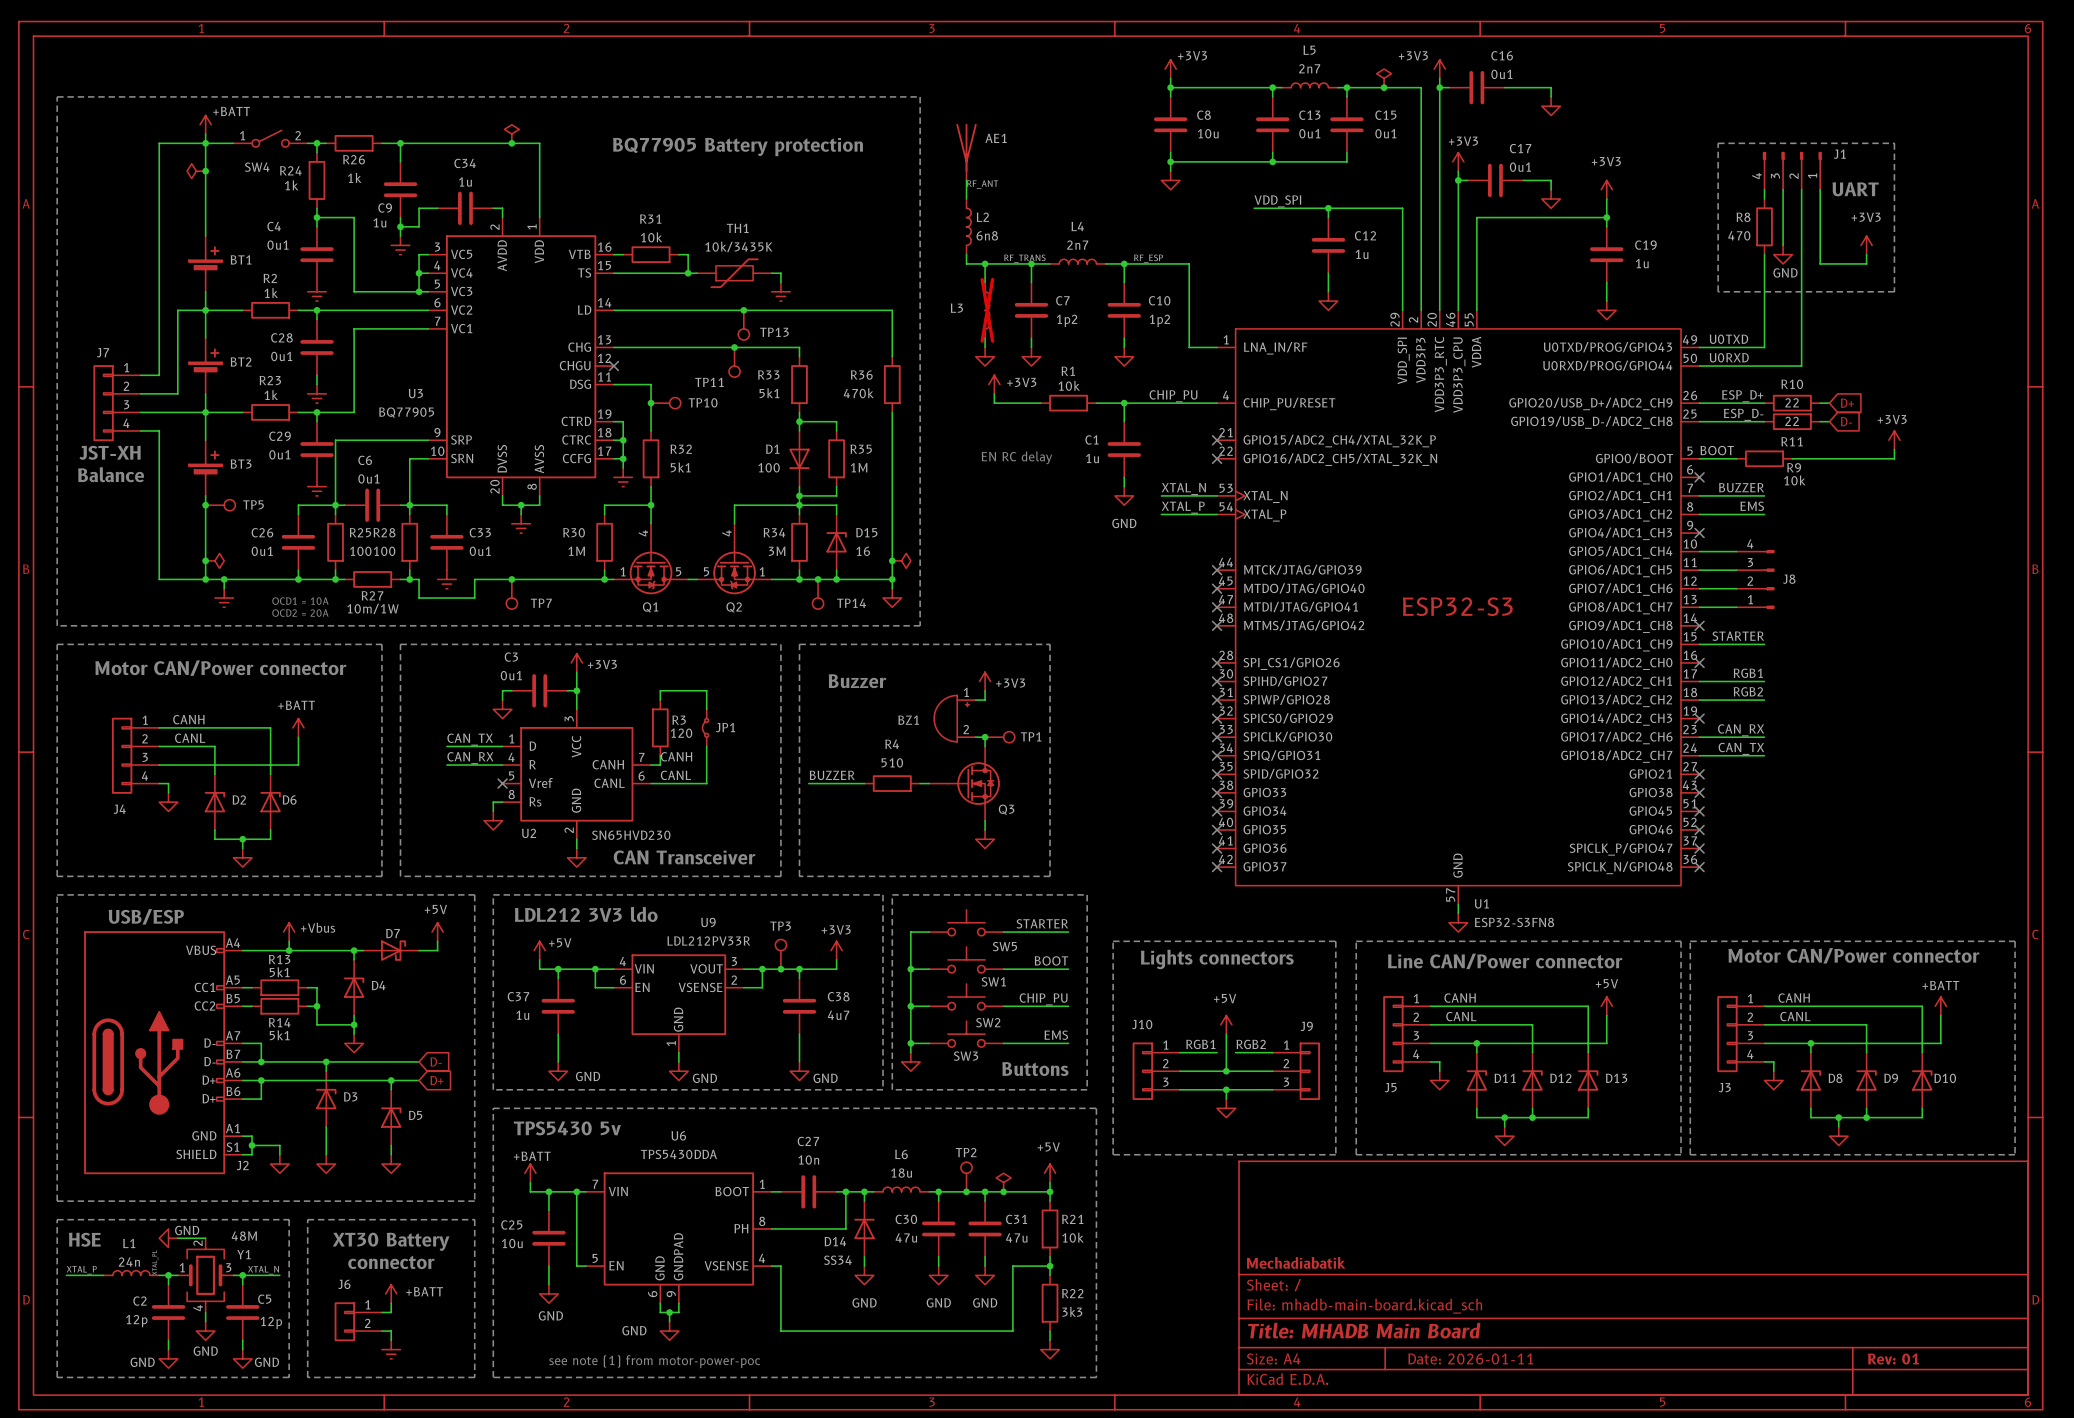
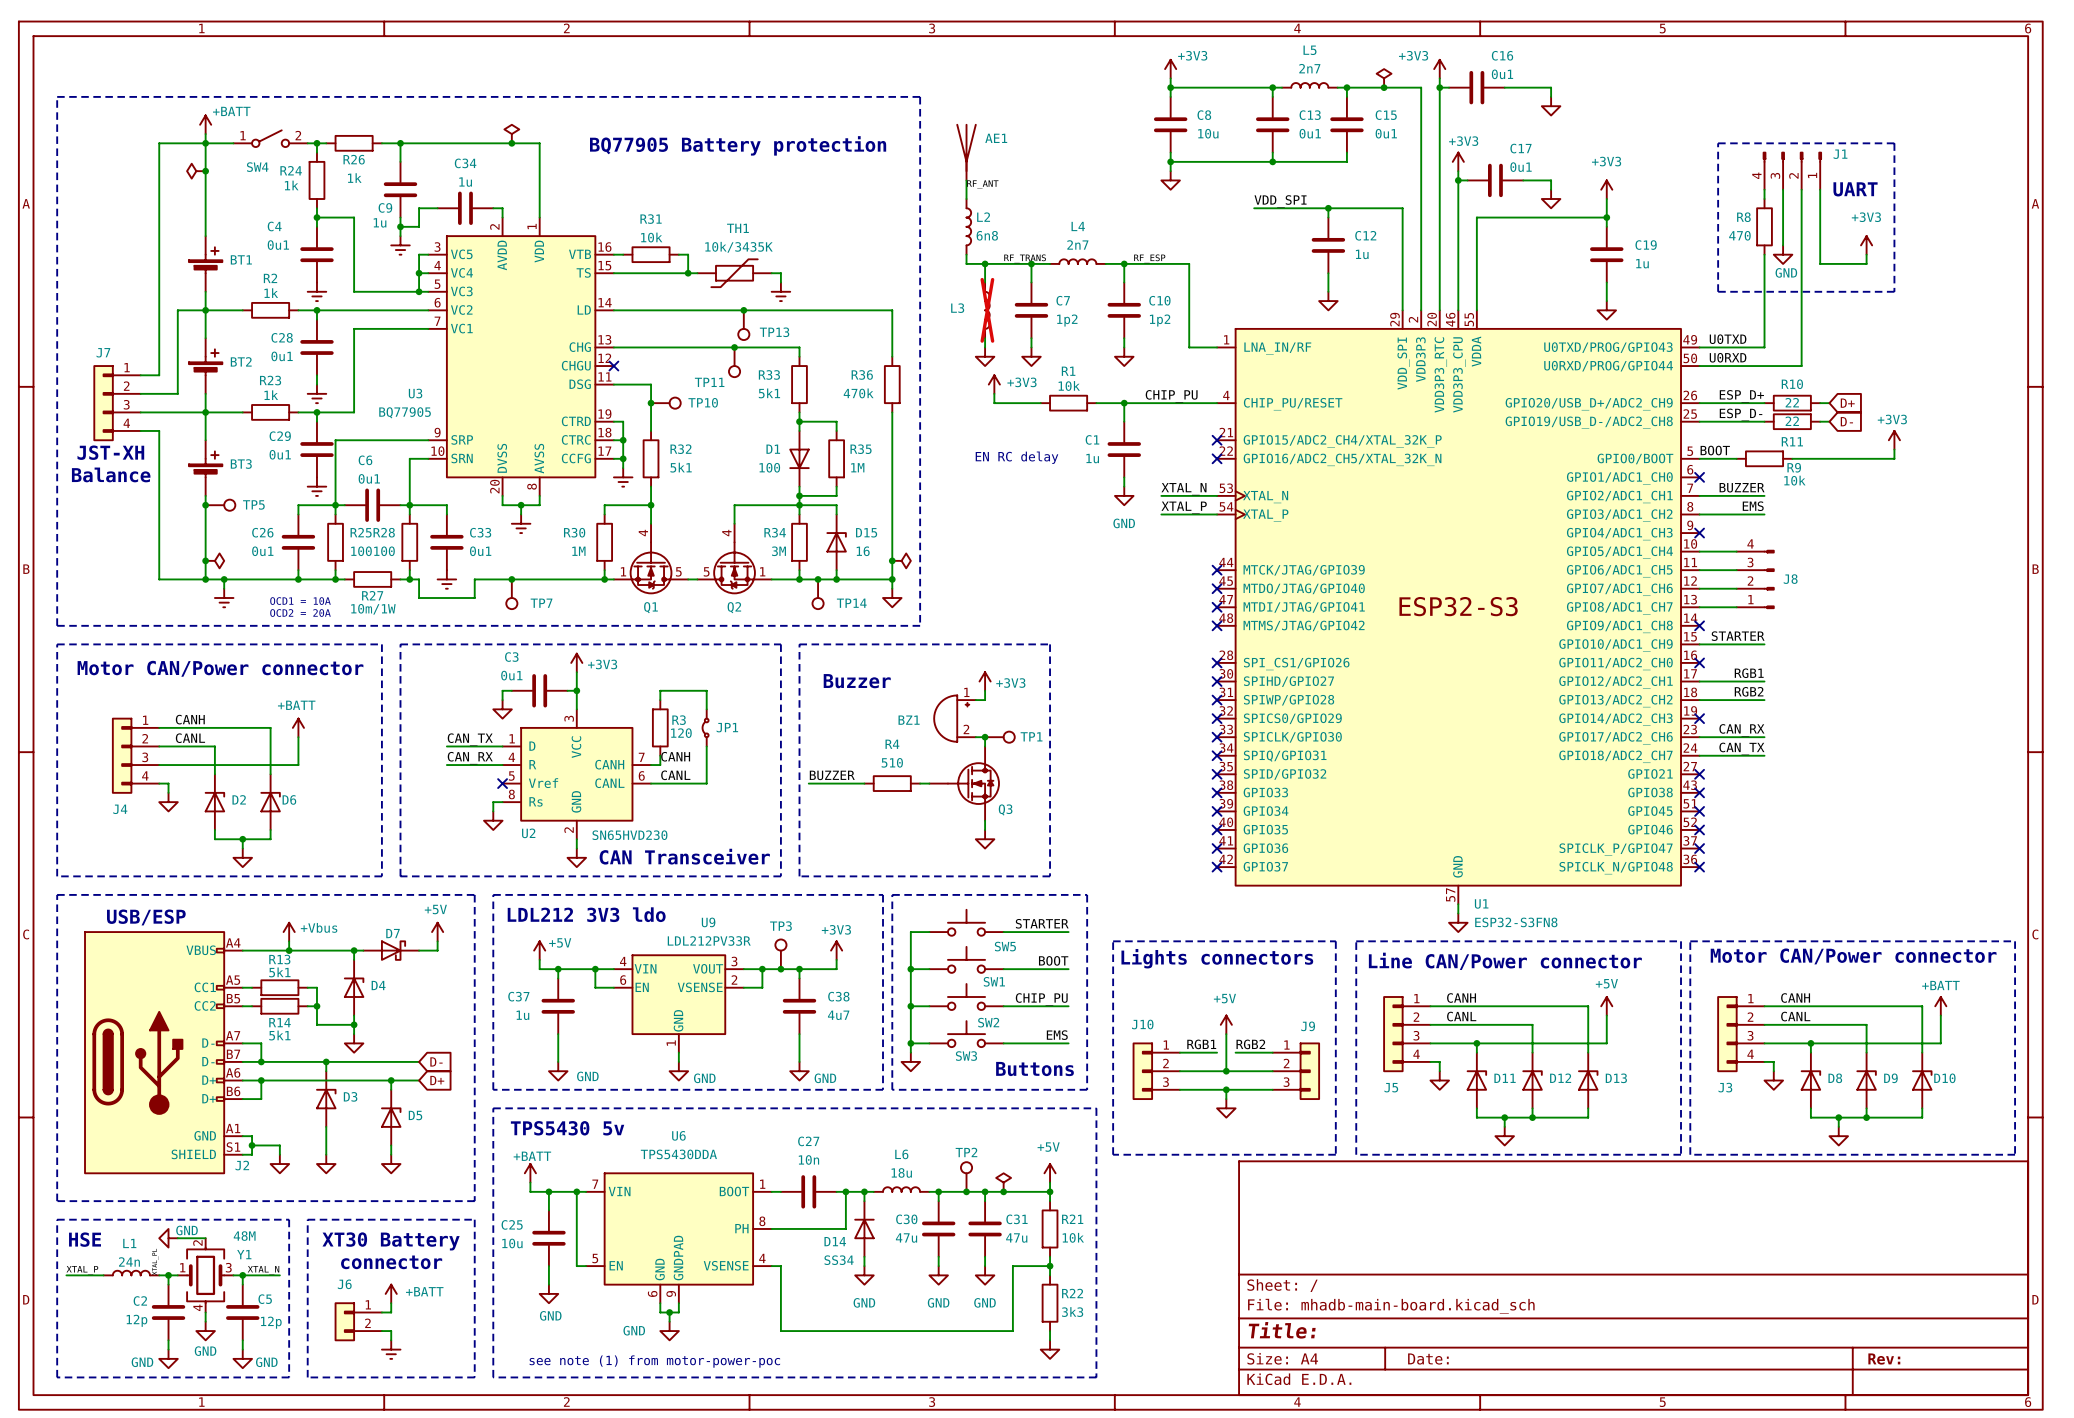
title block: Mechadiabatik (1296, 1262) -> none
title block: Title: MHADB Main Board (1364, 1330) -> Title: (1282, 1330)
title block: Date: 2026-01-11 (1470, 1358) -> Date: (1428, 1359)
title block: Rev: 01 (1893, 1359) -> Rev: (1884, 1359)

